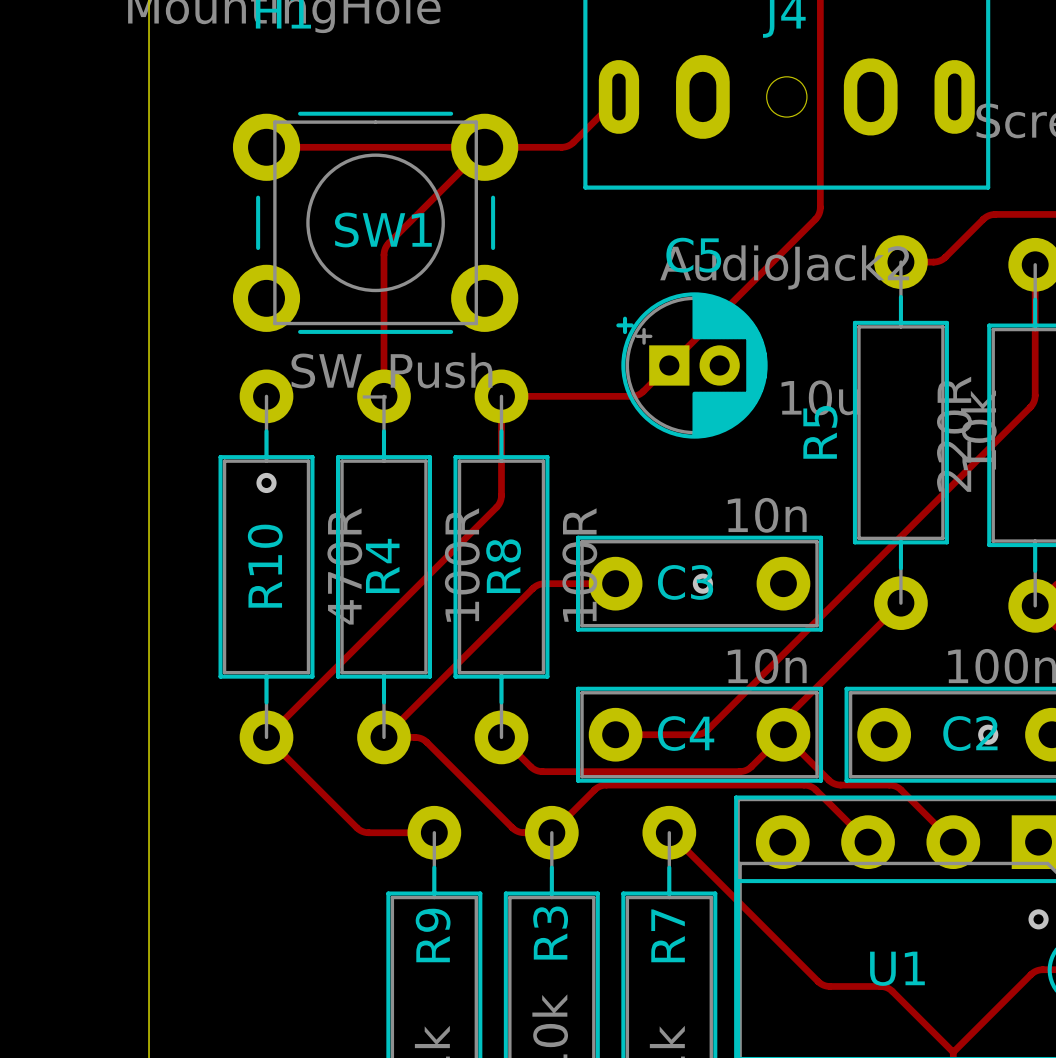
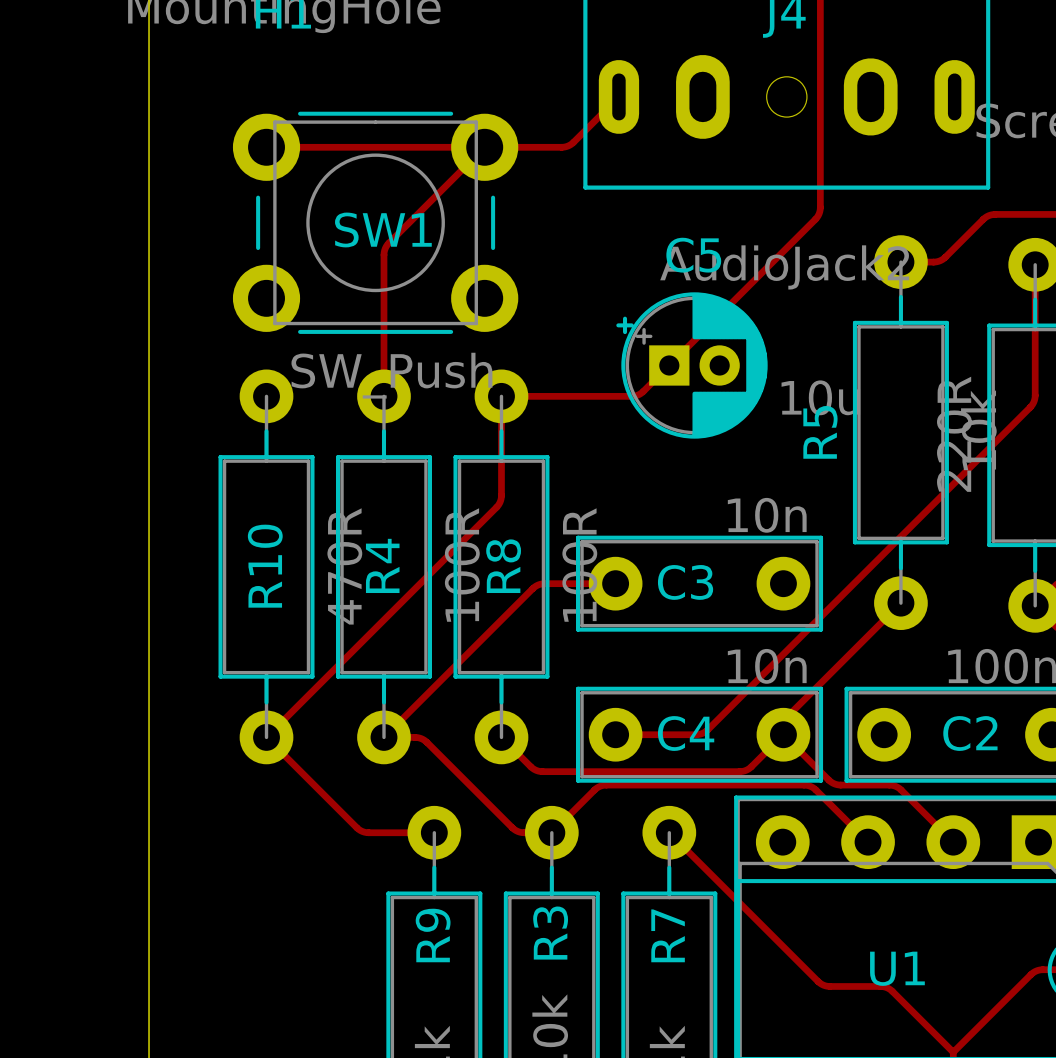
via: (266, 482) -> none
via: (702, 583) -> none
via: (988, 734) -> none
via: (1038, 919) -> none

